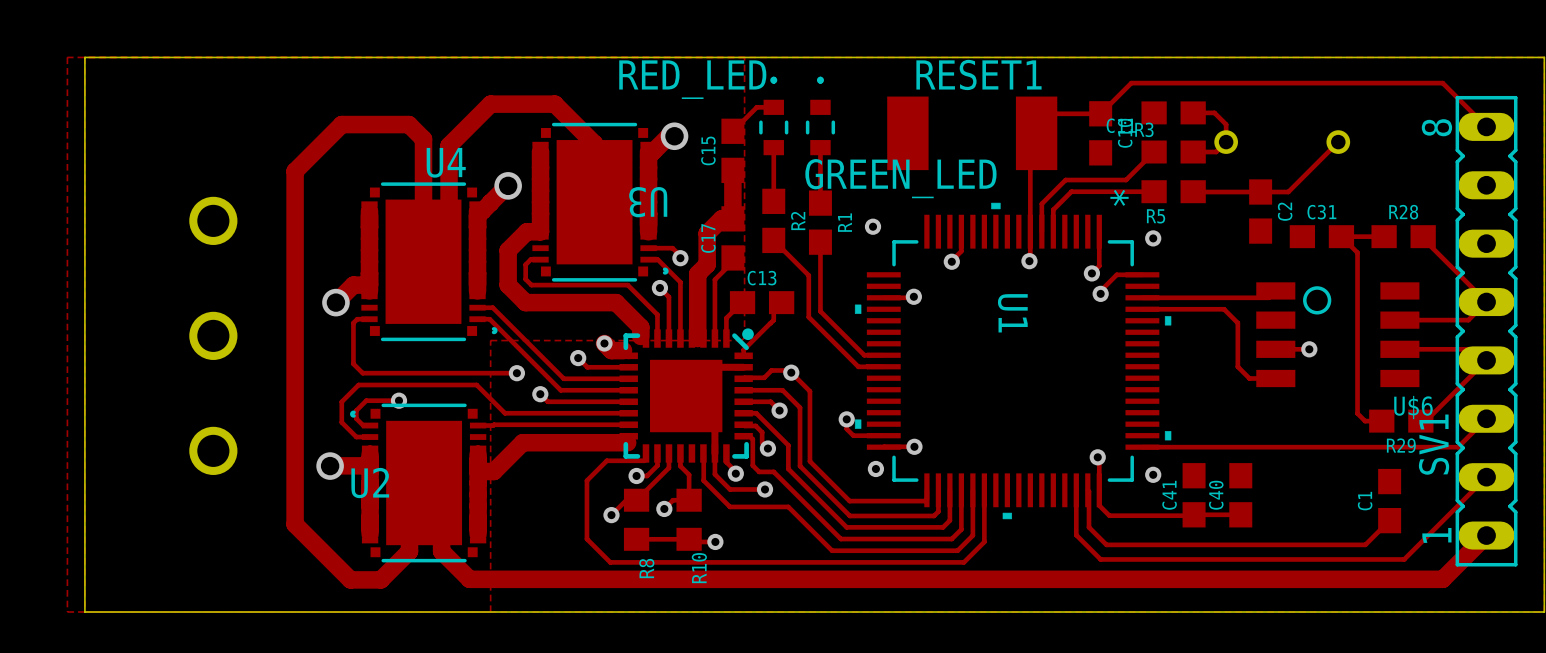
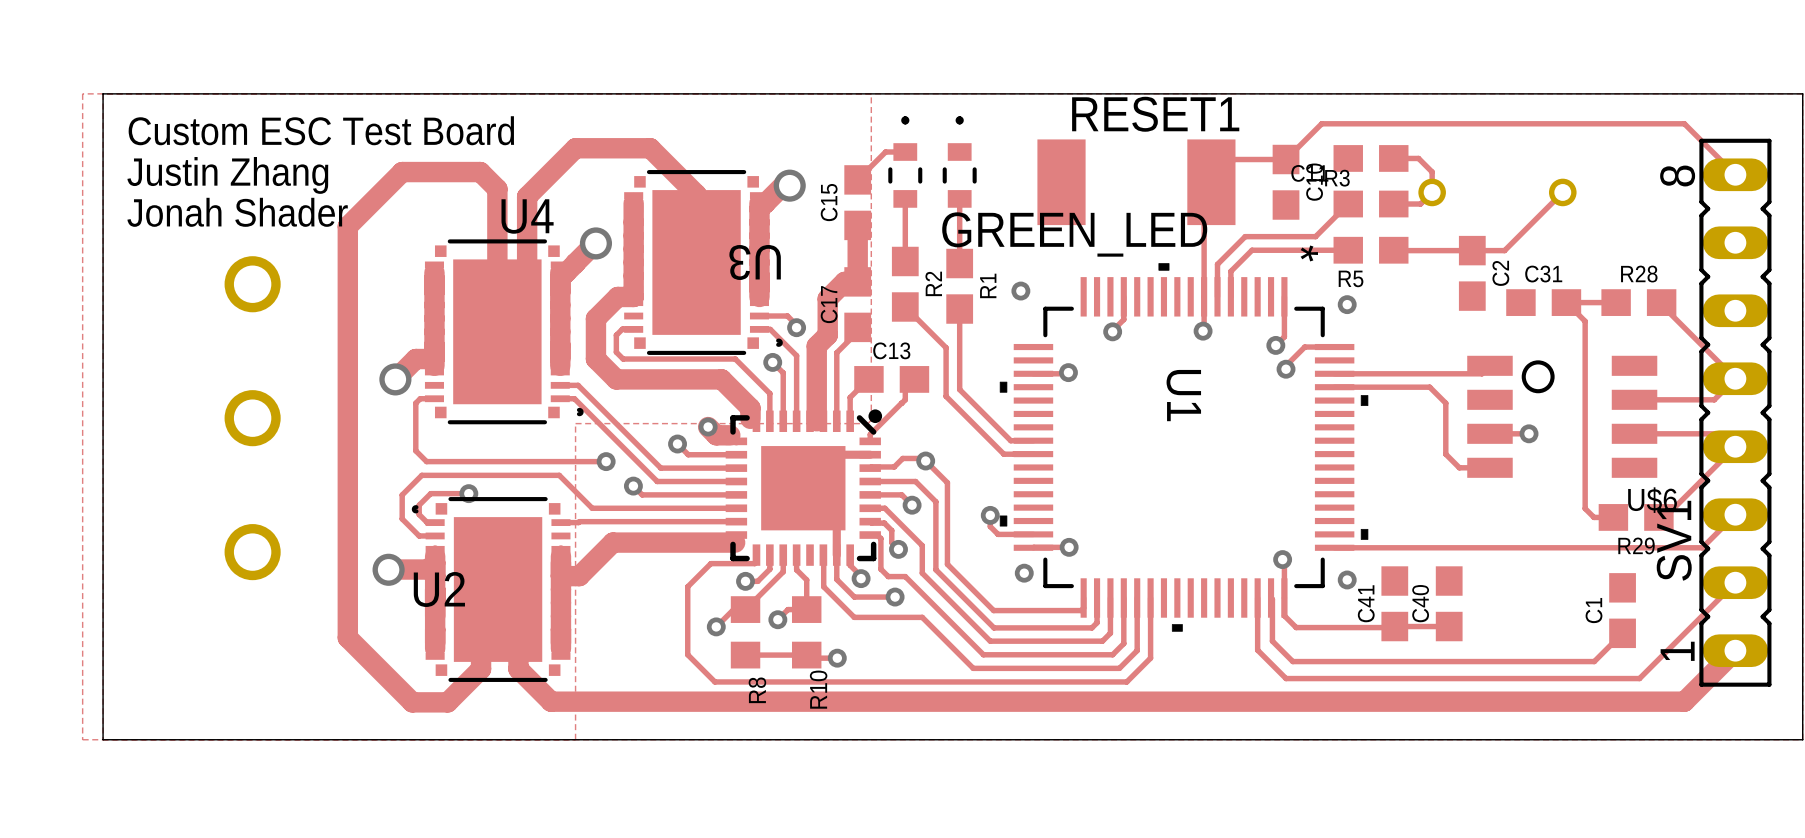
RED_LED name: RED_LED (692, 79) -> none
text: none -> Custom ESC Test Board (321, 130)
text: none -> Justin Zhang (227, 175)
text: none -> Jonah Shader (237, 212)

